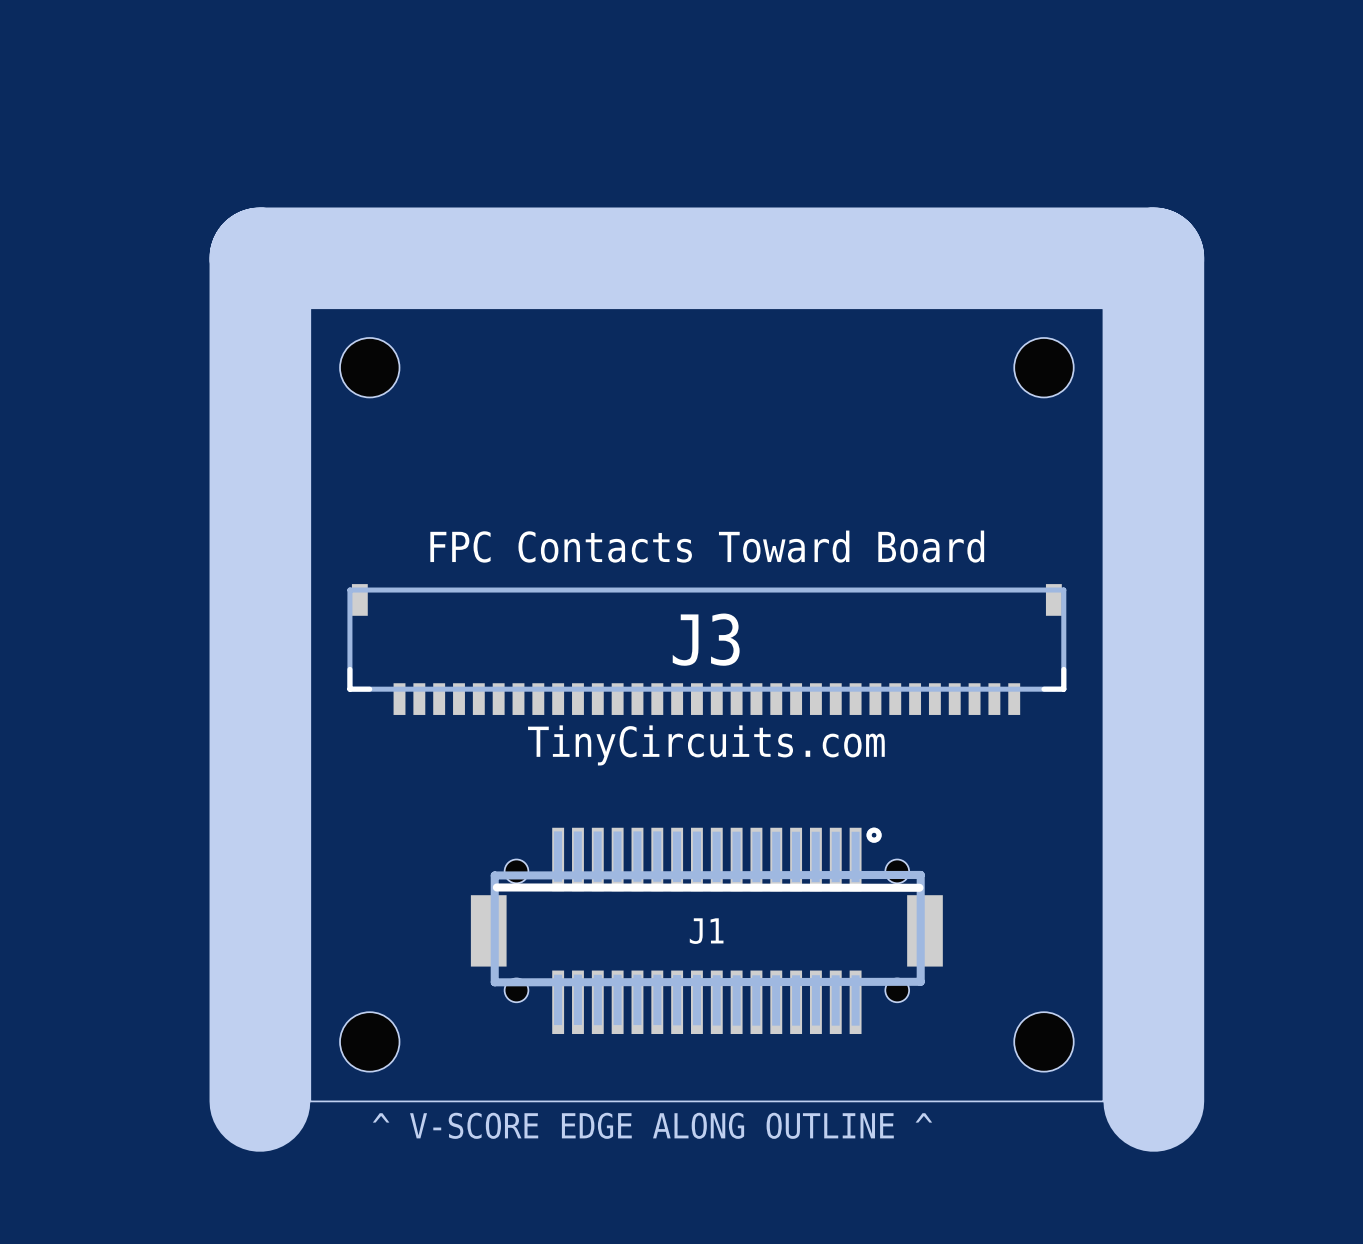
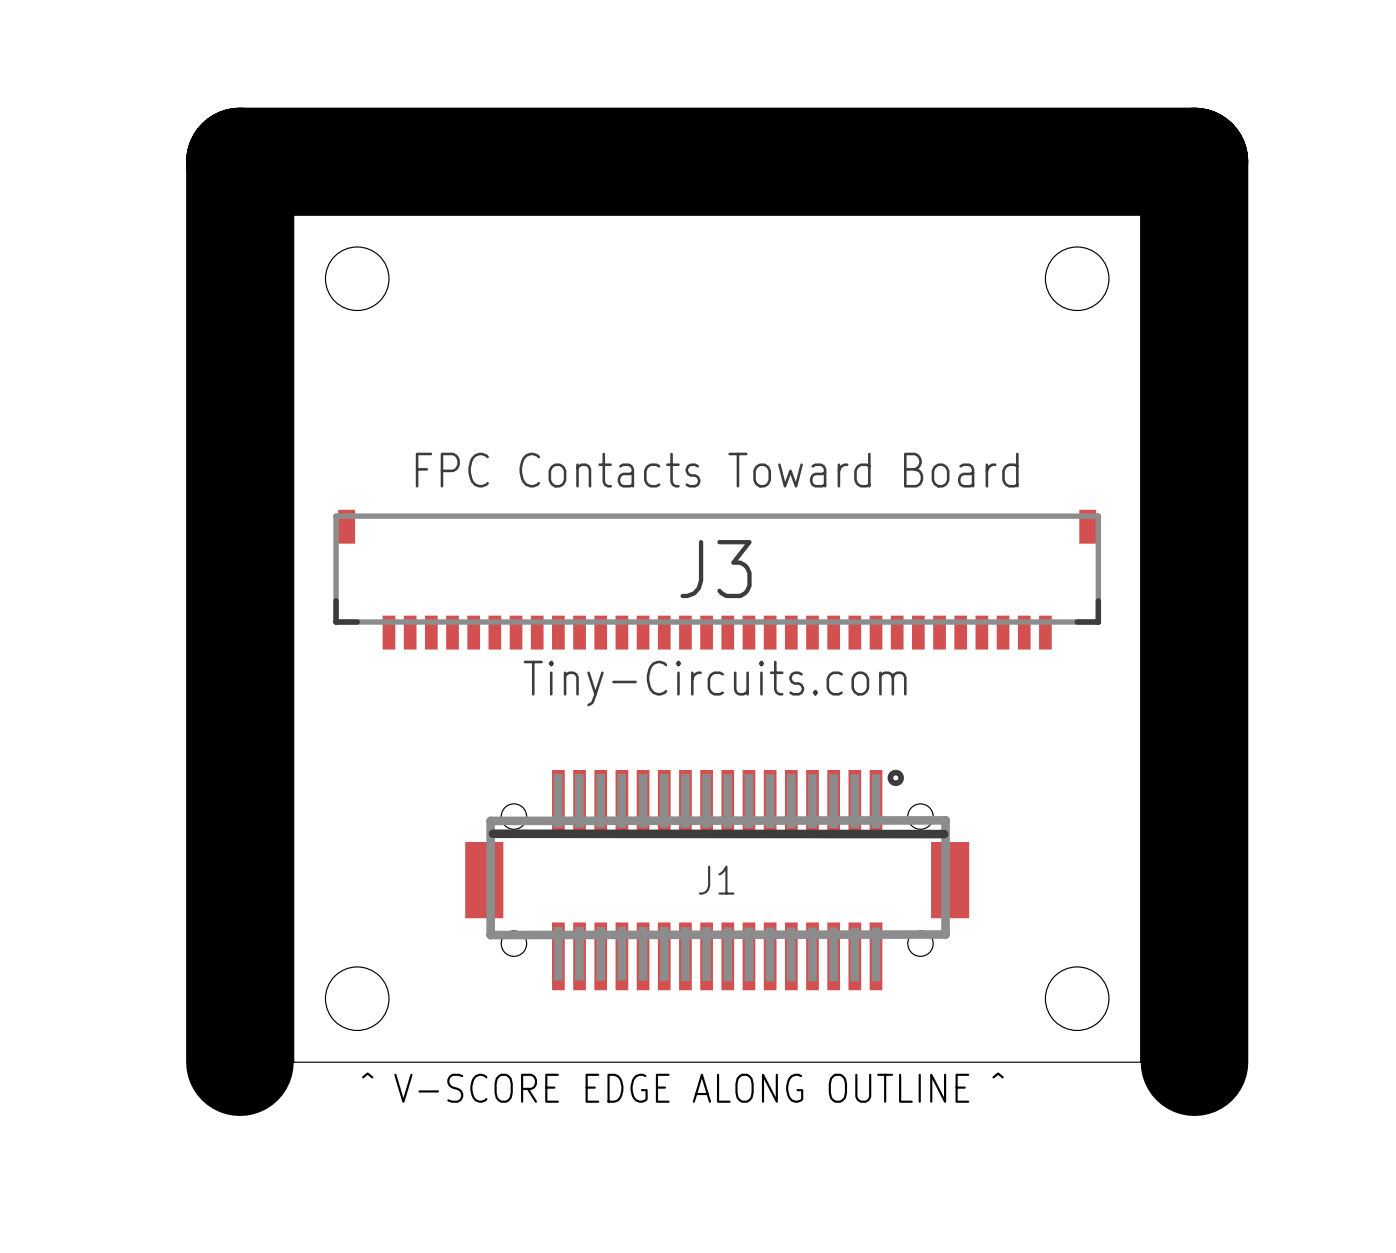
text: TinyCircuits.com (706, 745) -> Tiny-Circuits.com (715, 683)

